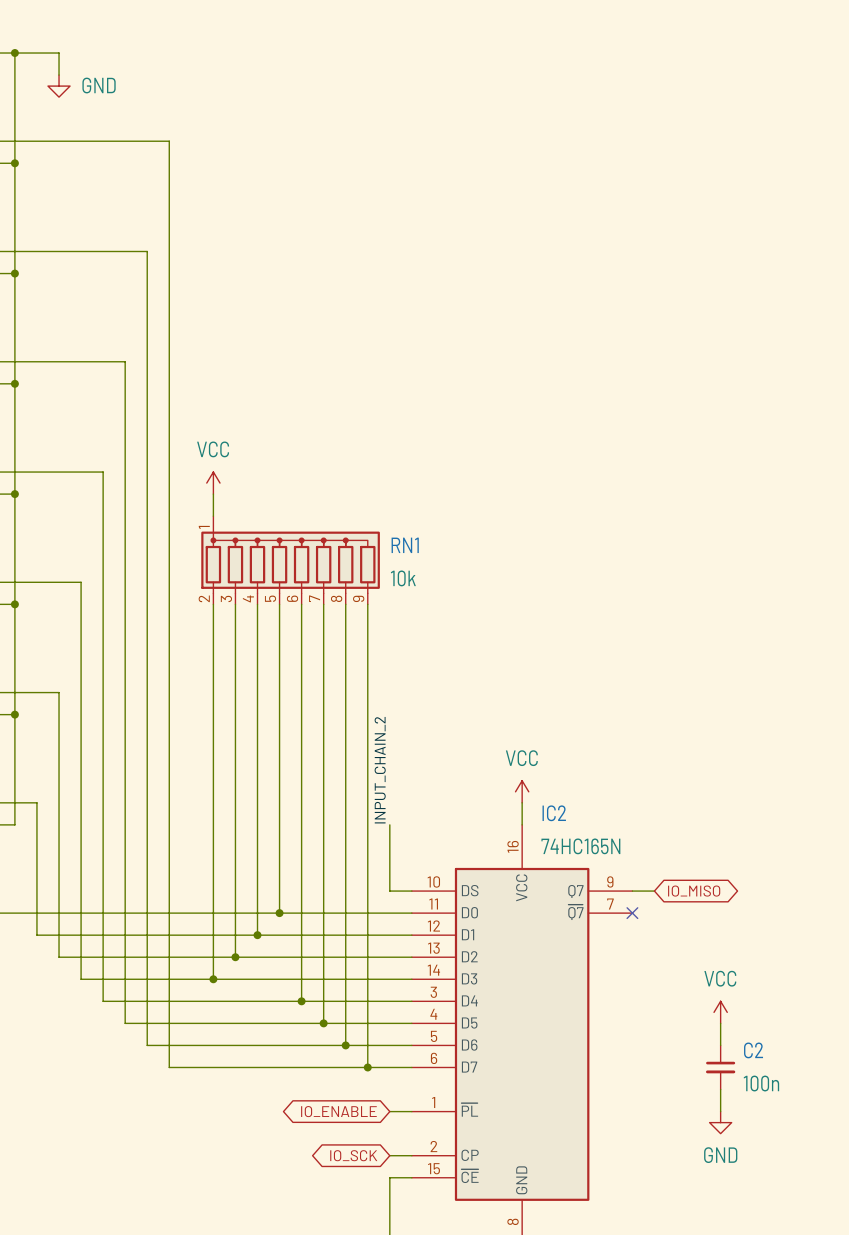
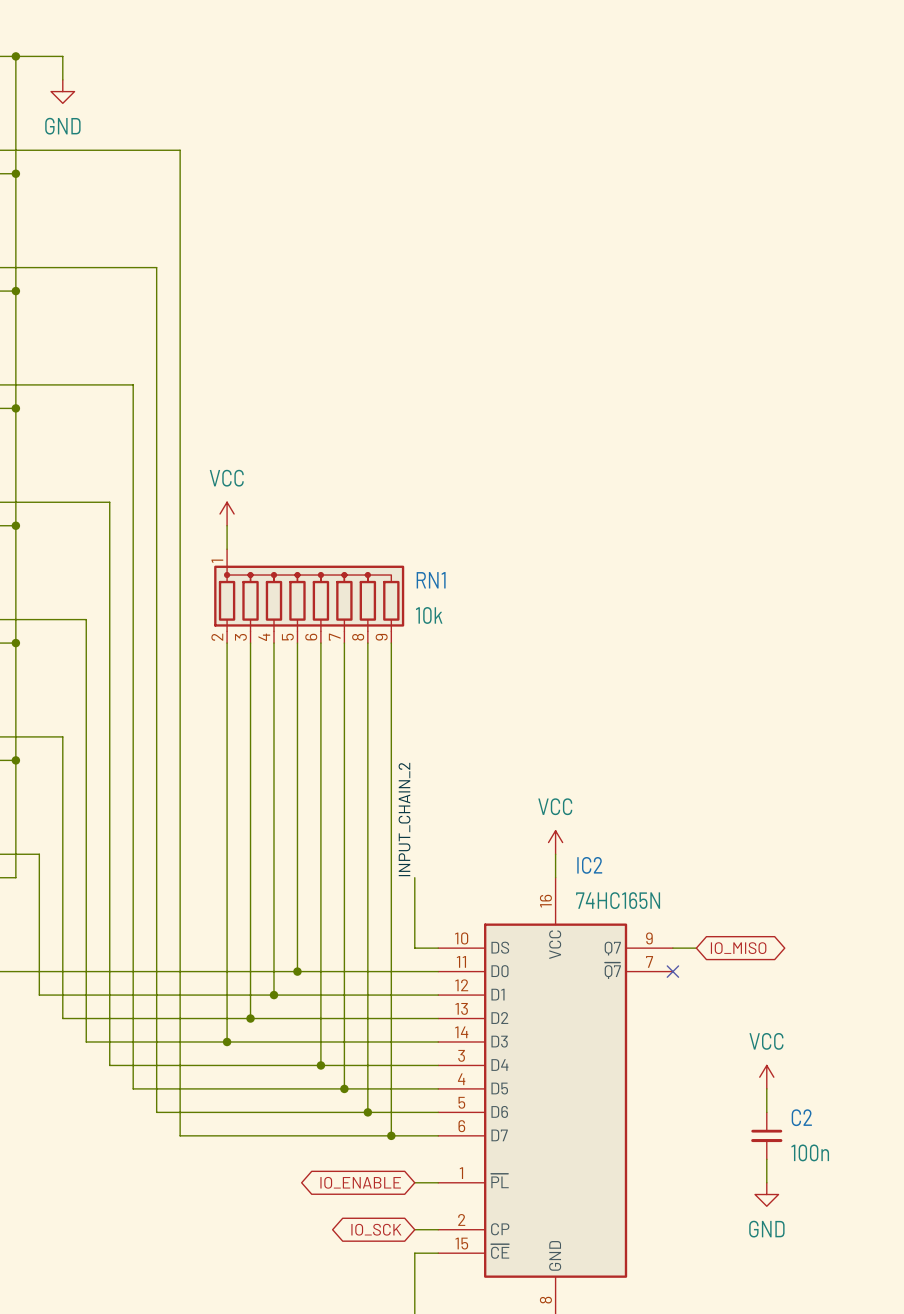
power symbol text position: GND (99, 85) -> GND (62, 126)

